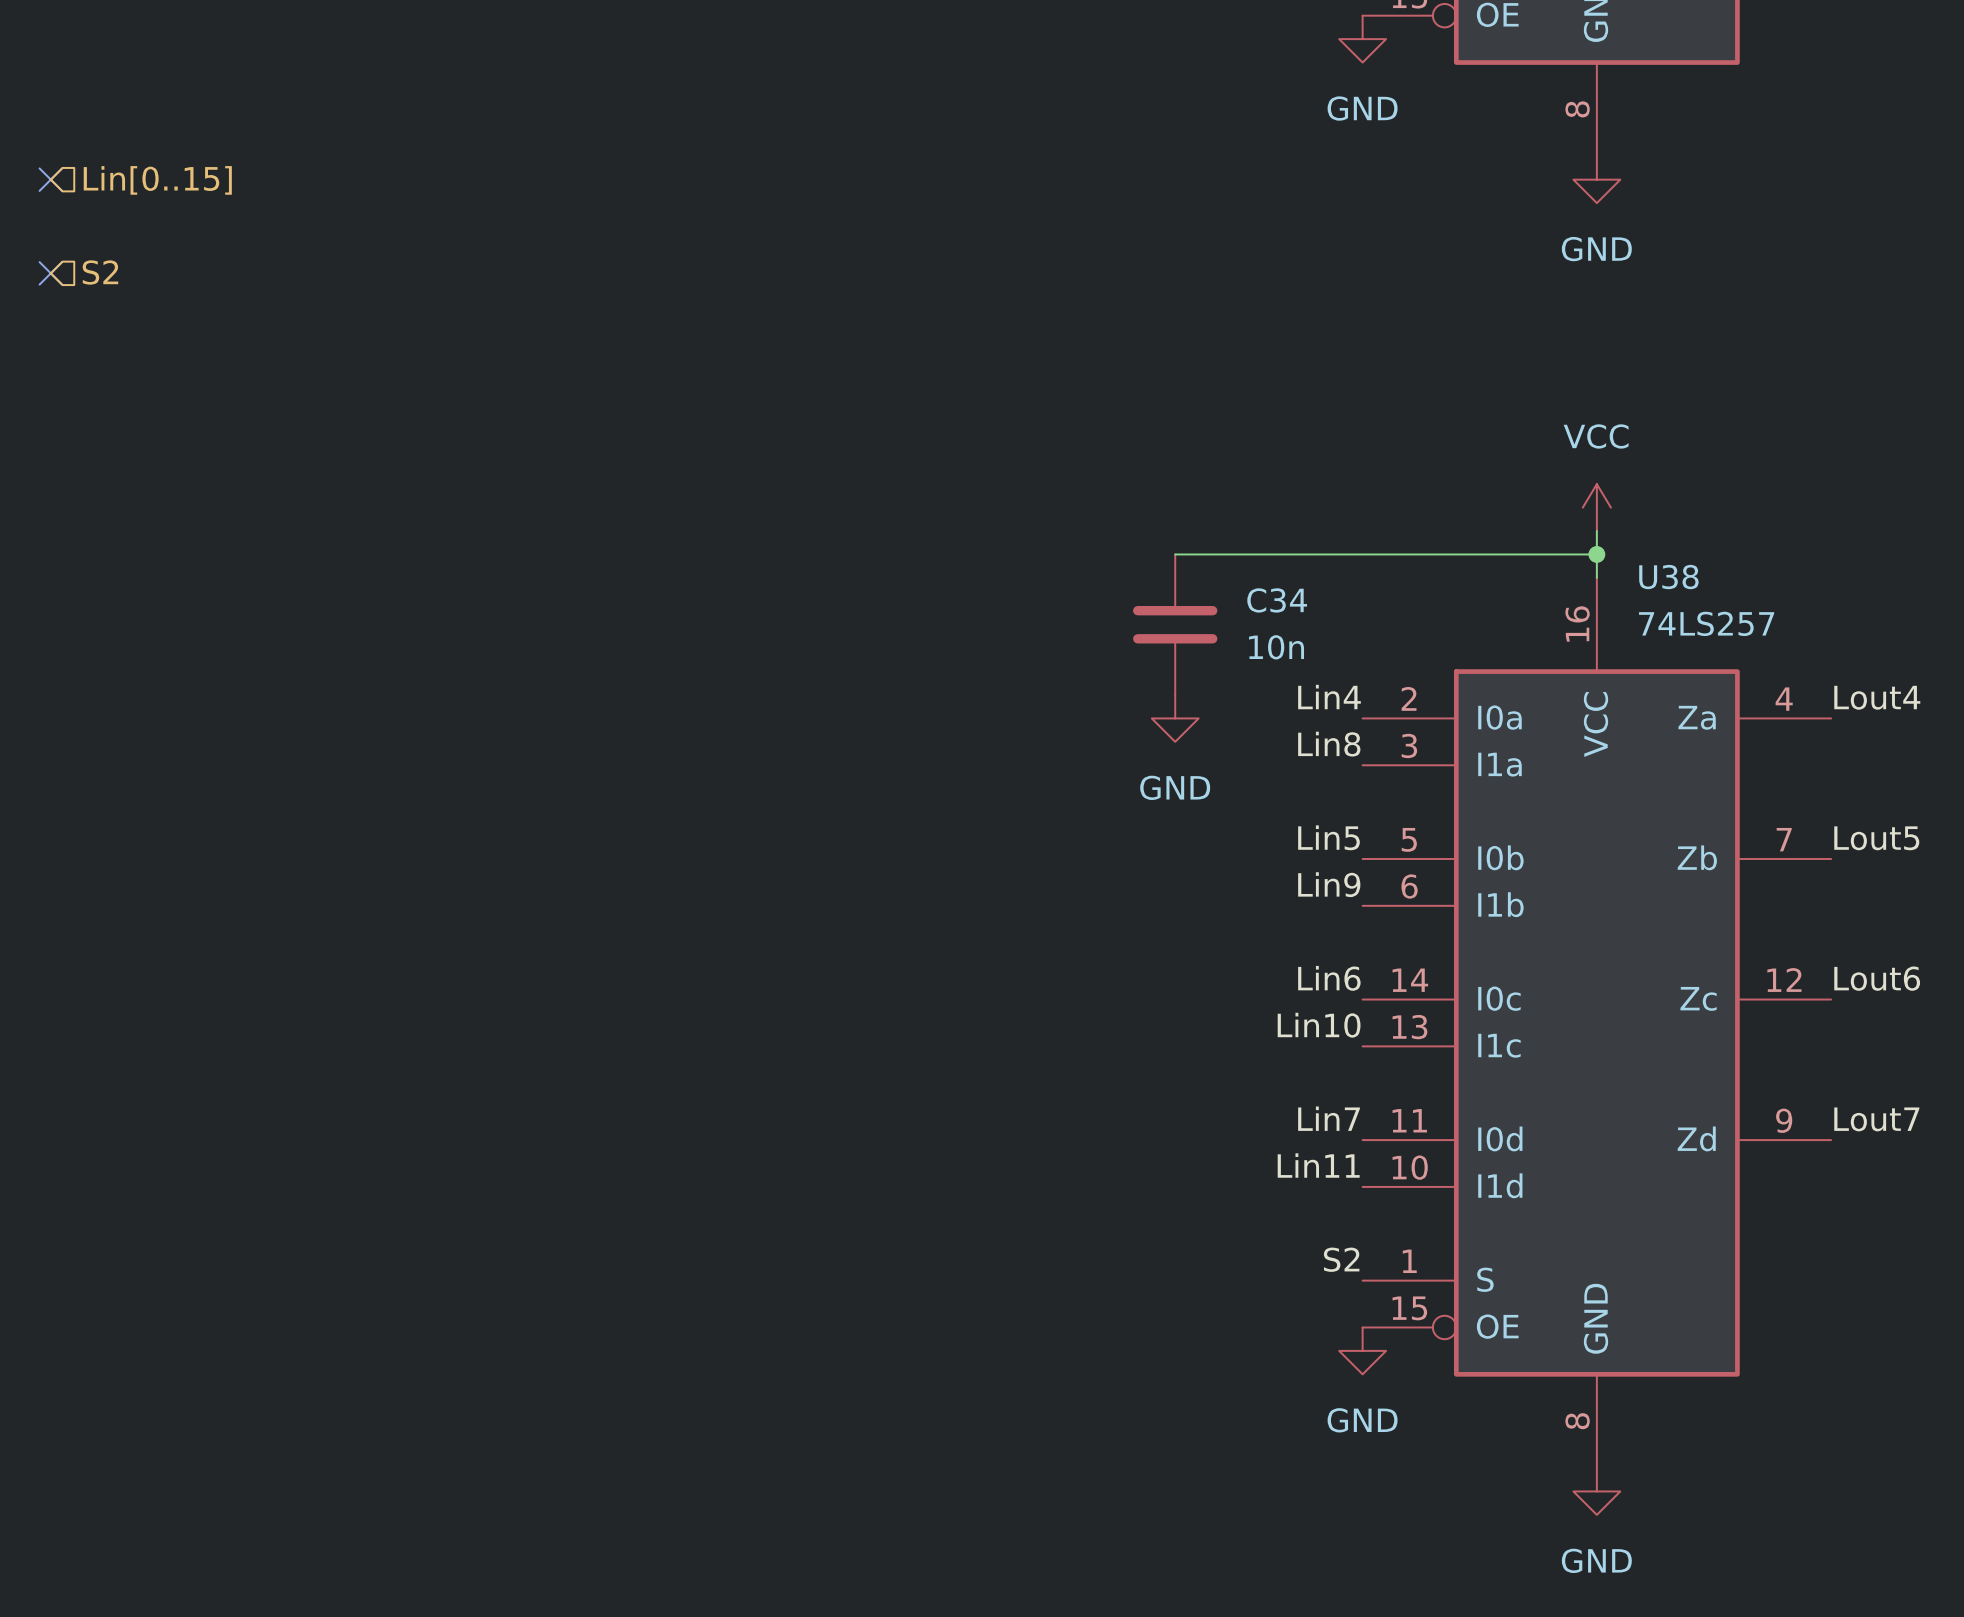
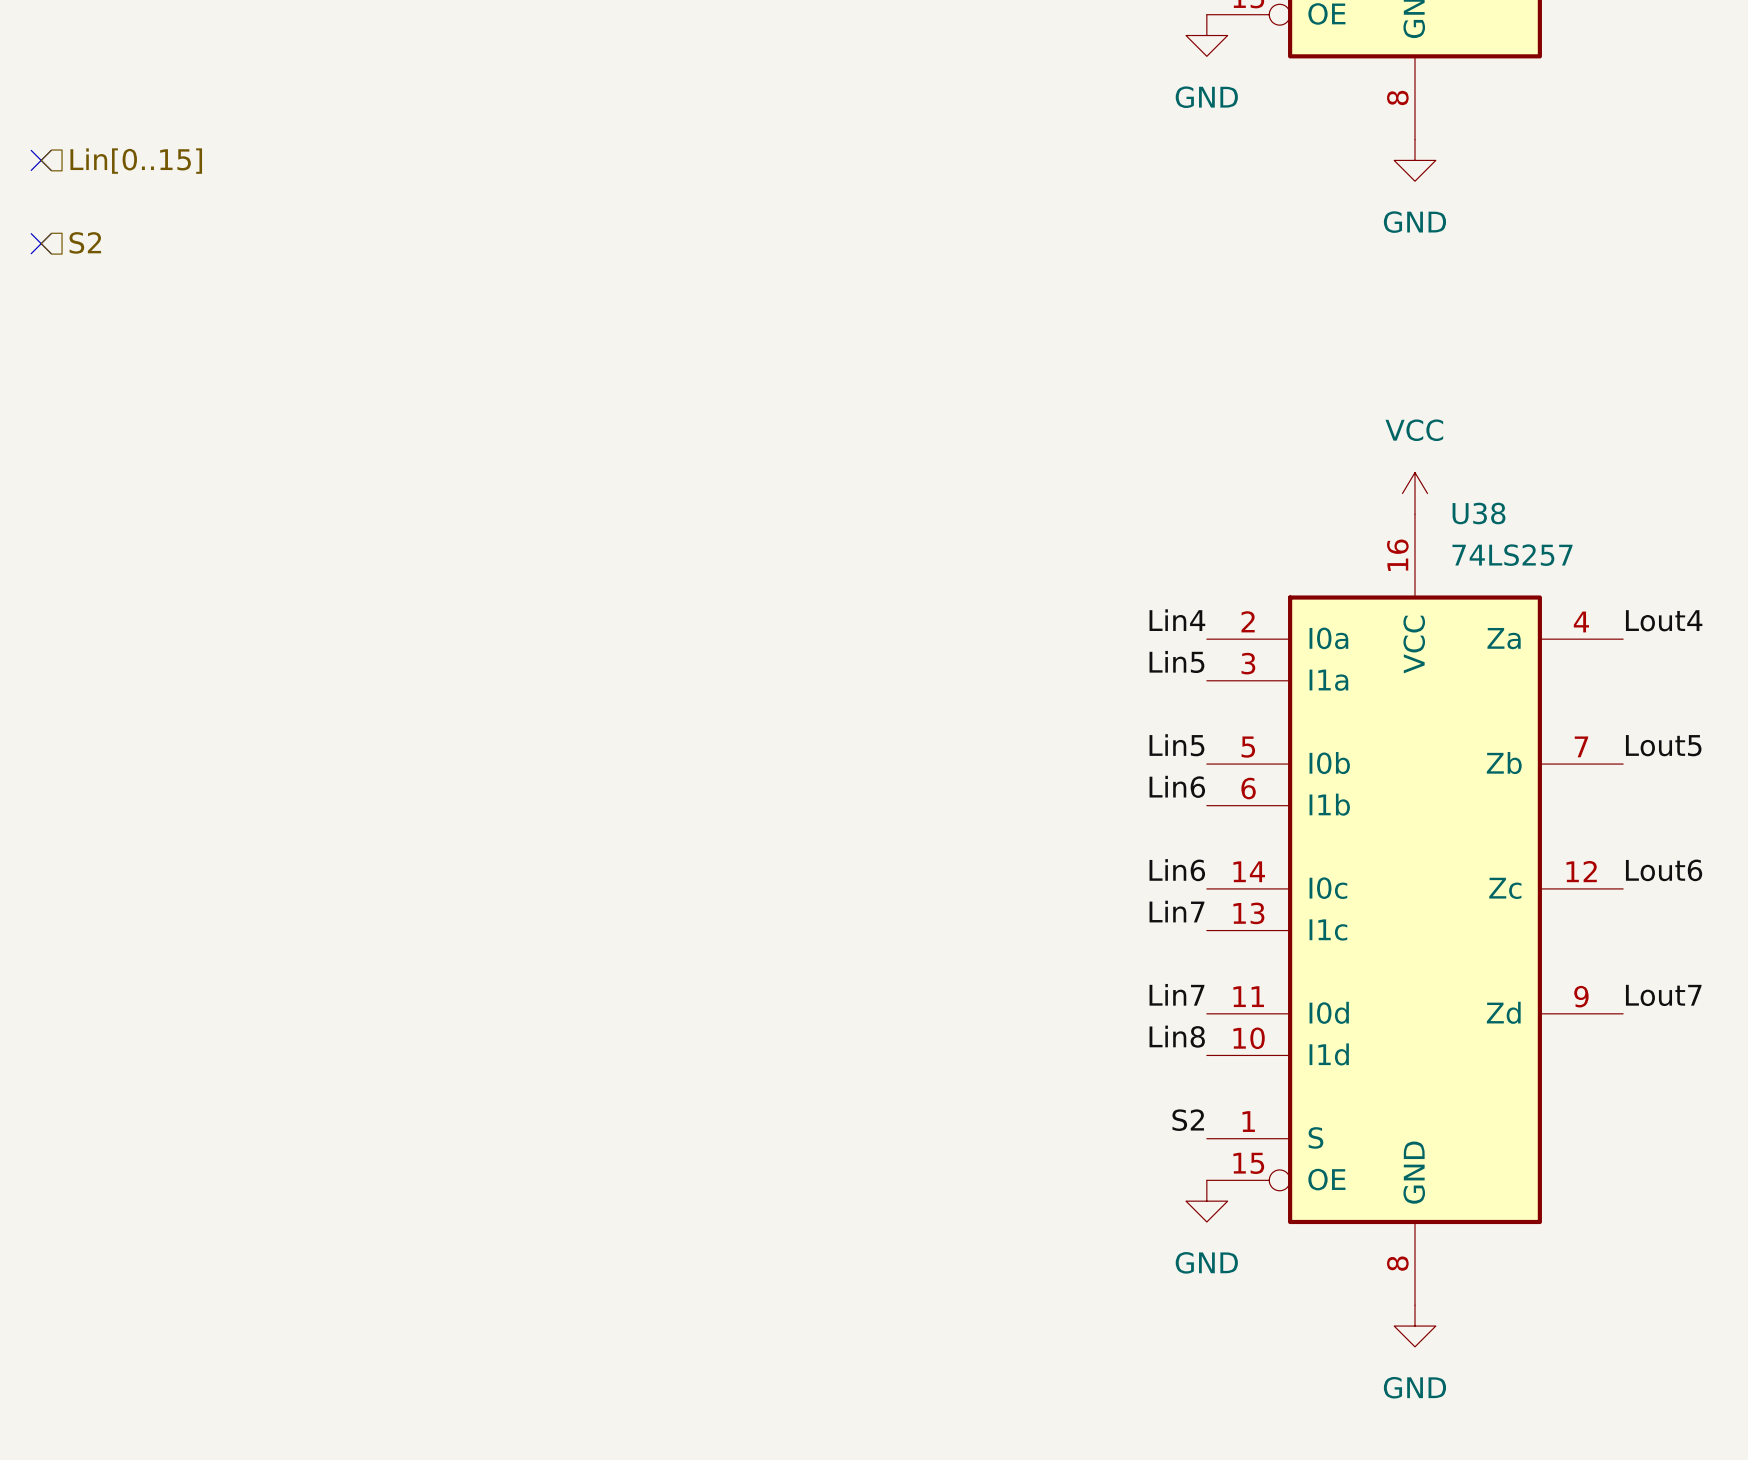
power symbol position: VCC (1596, 507) -> VCC (1414, 493)
wire: (1175, 554) (1596, 554) -> none
junction: (1596, 554) -> none
C34: 10n (1175, 624) -> none
power symbol: GND (1175, 718) -> none
label: Lin8 (1329, 744) -> Lin5 (1176, 661)
label: Lin9 (1329, 884) -> Lin6 (1177, 786)
label: Lin10 (1319, 1025) -> Lin7 (1176, 911)
label: Lin11 (1318, 1165) -> Lin8 (1177, 1036)

